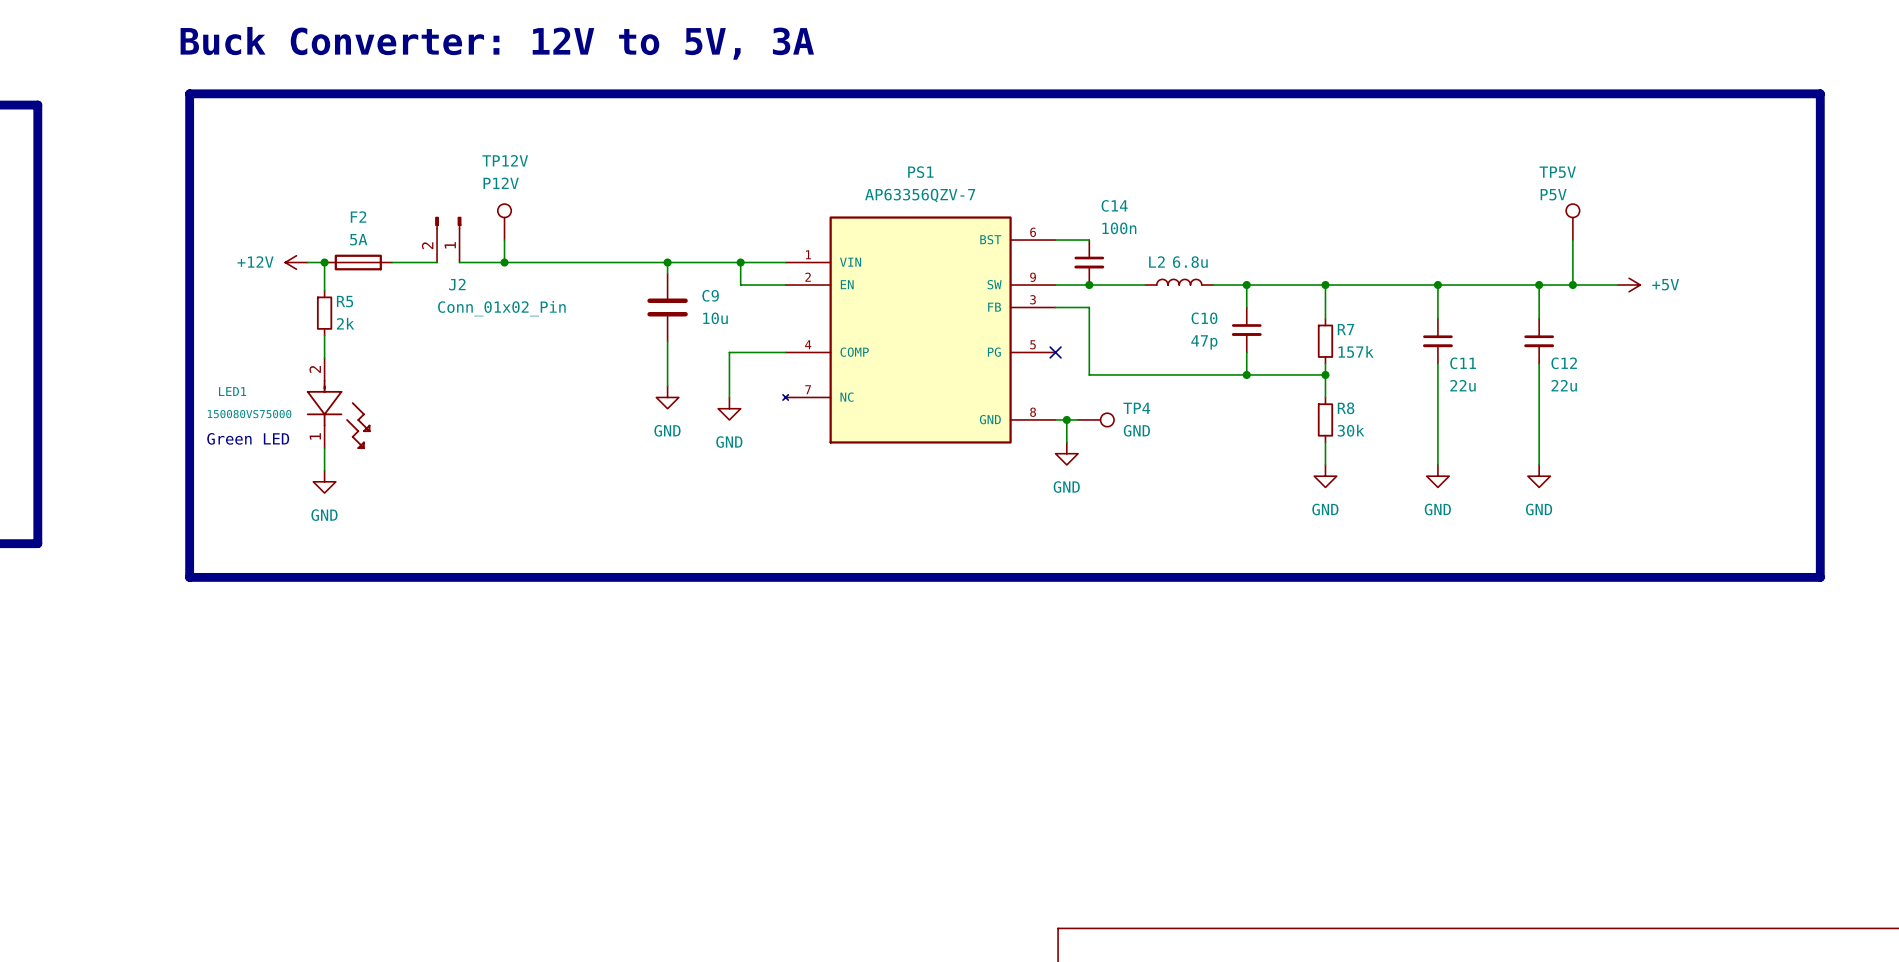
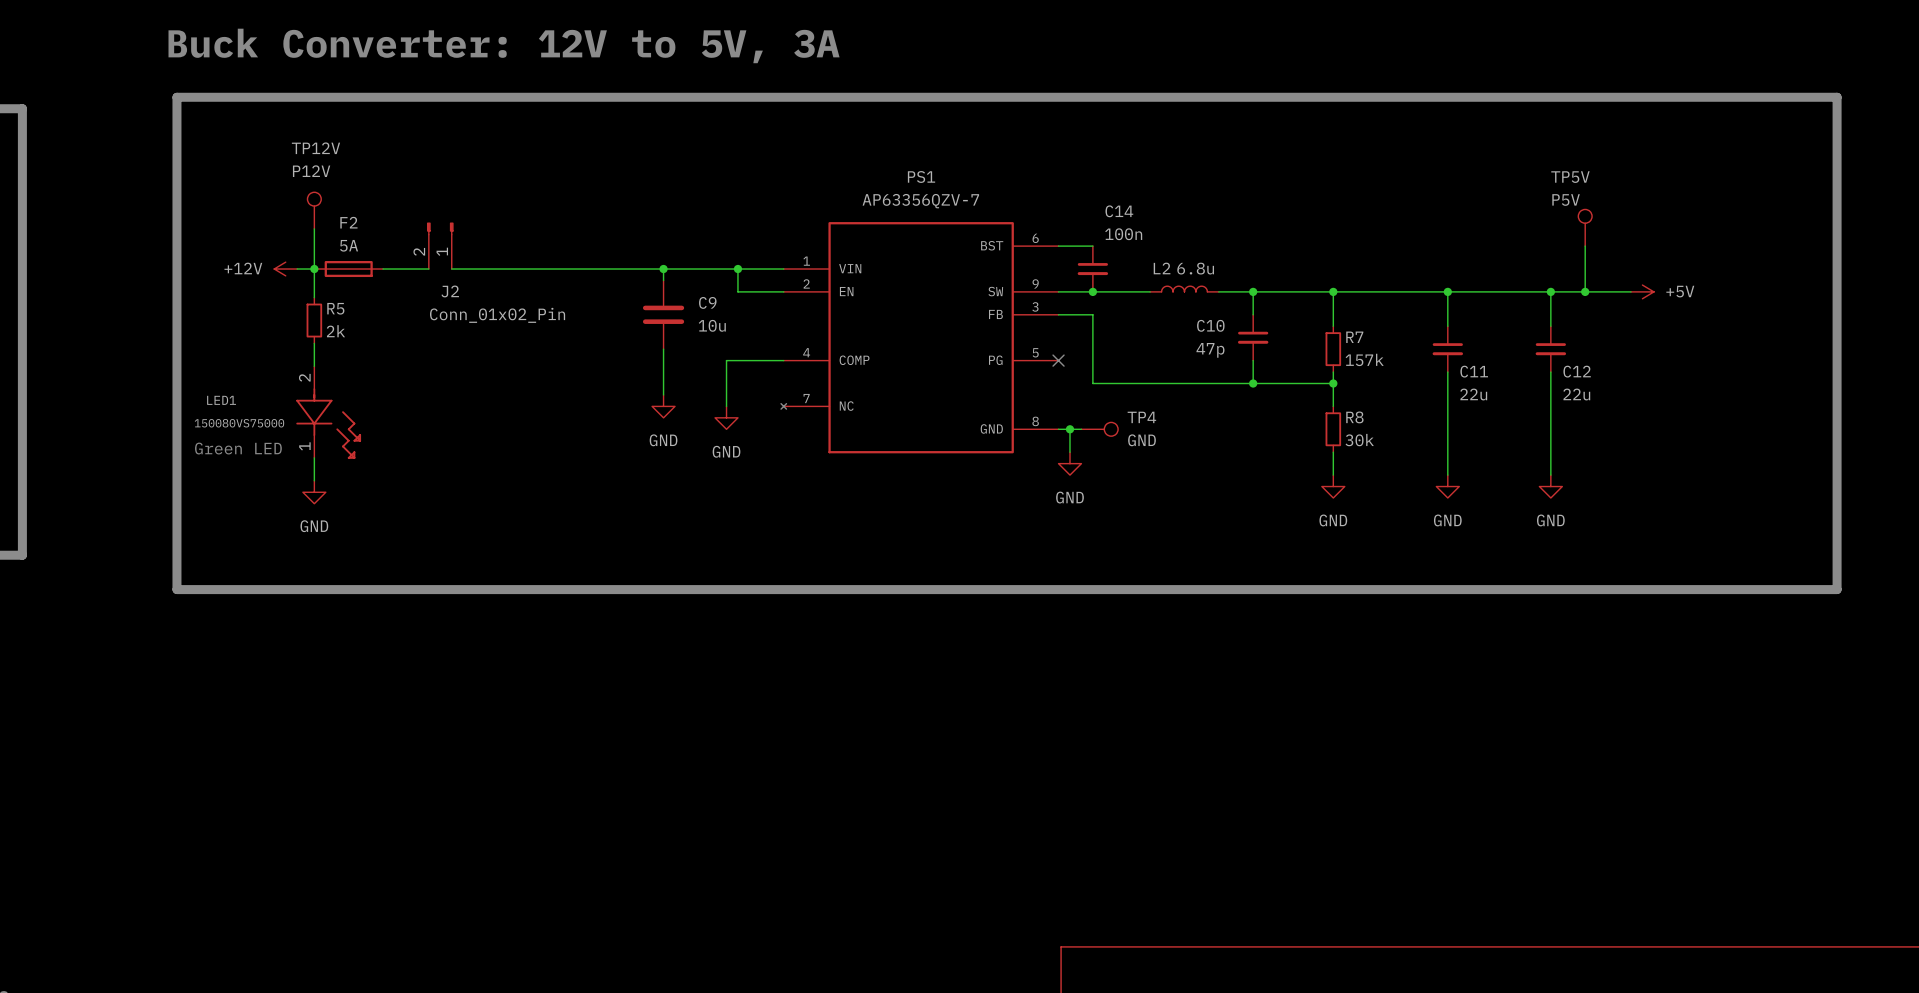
TP12V position: (504, 222) -> (314, 210)
wire: none -> (314, 228) (314, 269)
wire: (504, 240) (504, 262) -> none
junction: (504, 262) -> none

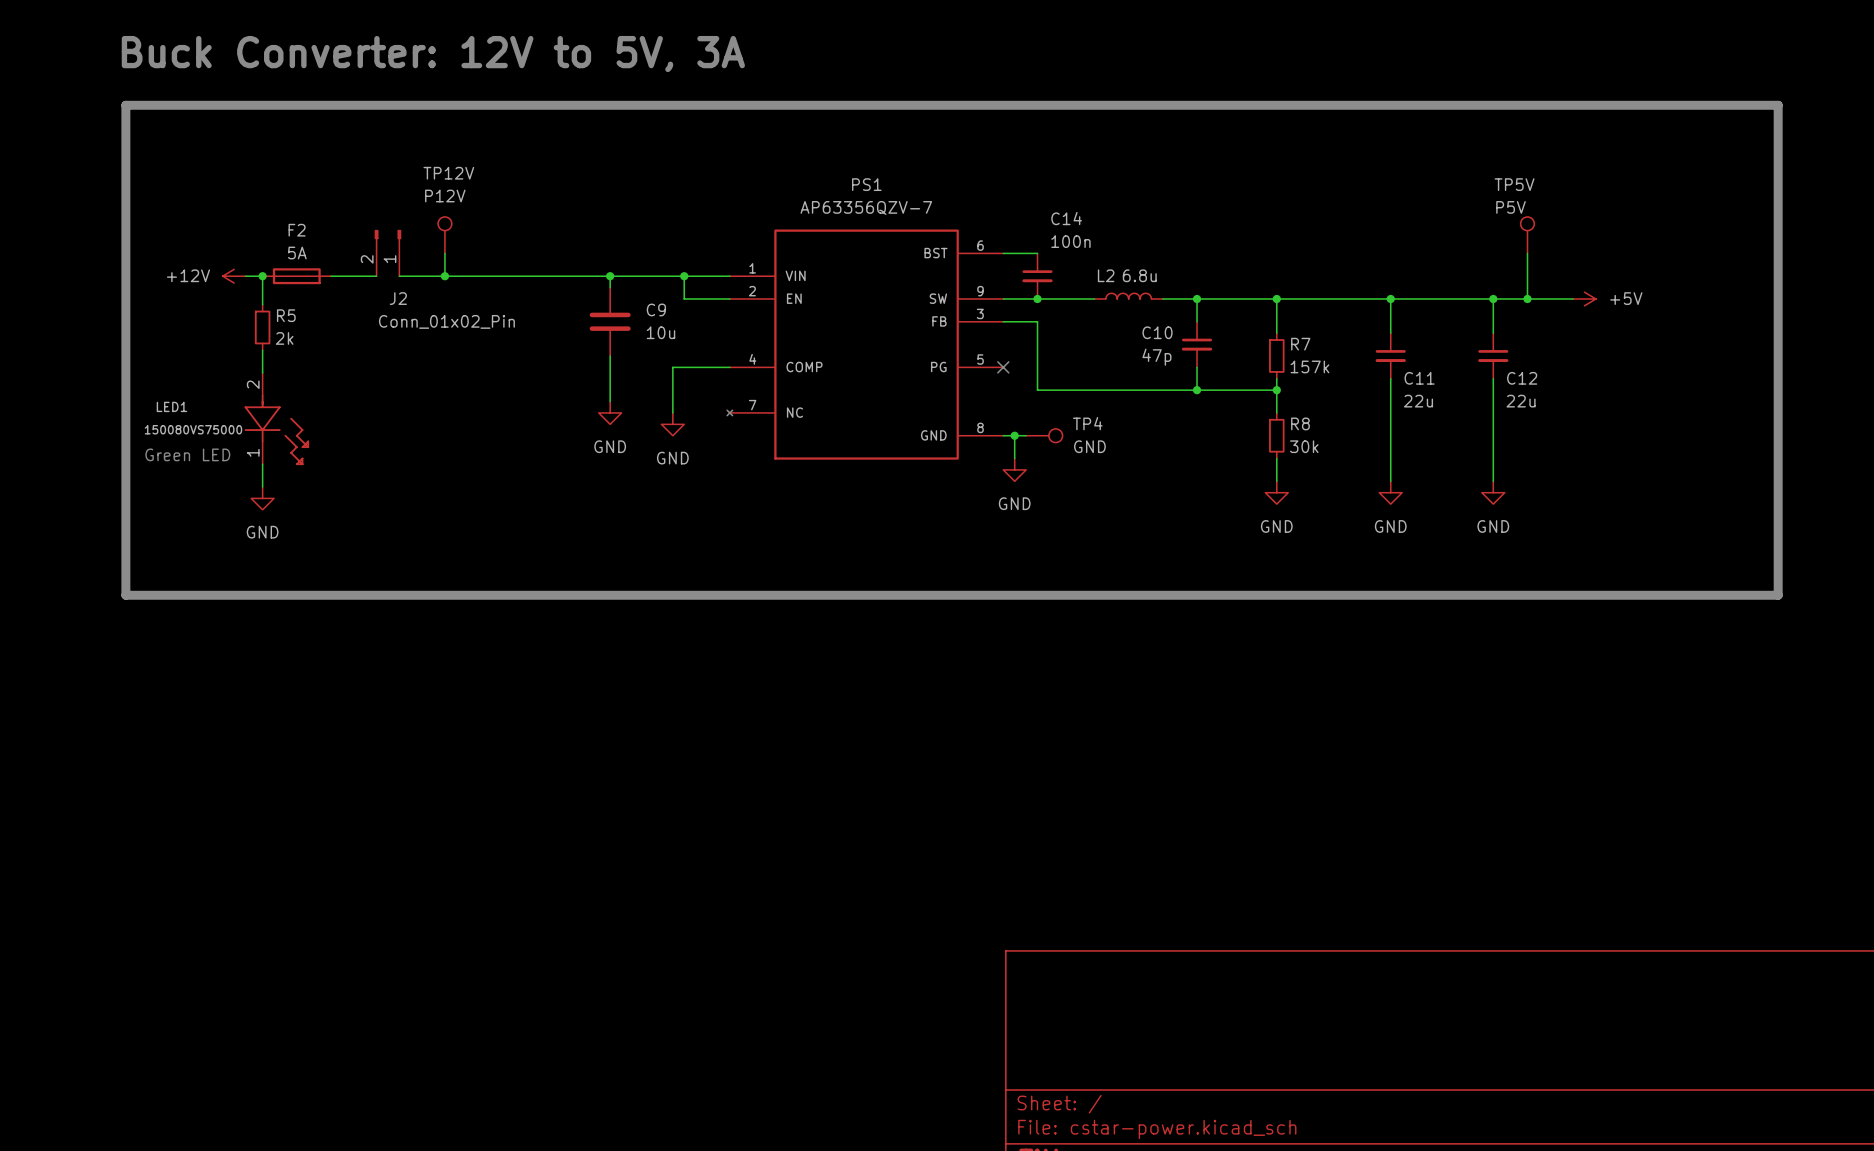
TP12V position: (314, 210) -> (444, 235)
wire: (314, 228) (314, 269) -> none
wire: none -> (444, 253) (444, 276)
junction: none -> (444, 276)

